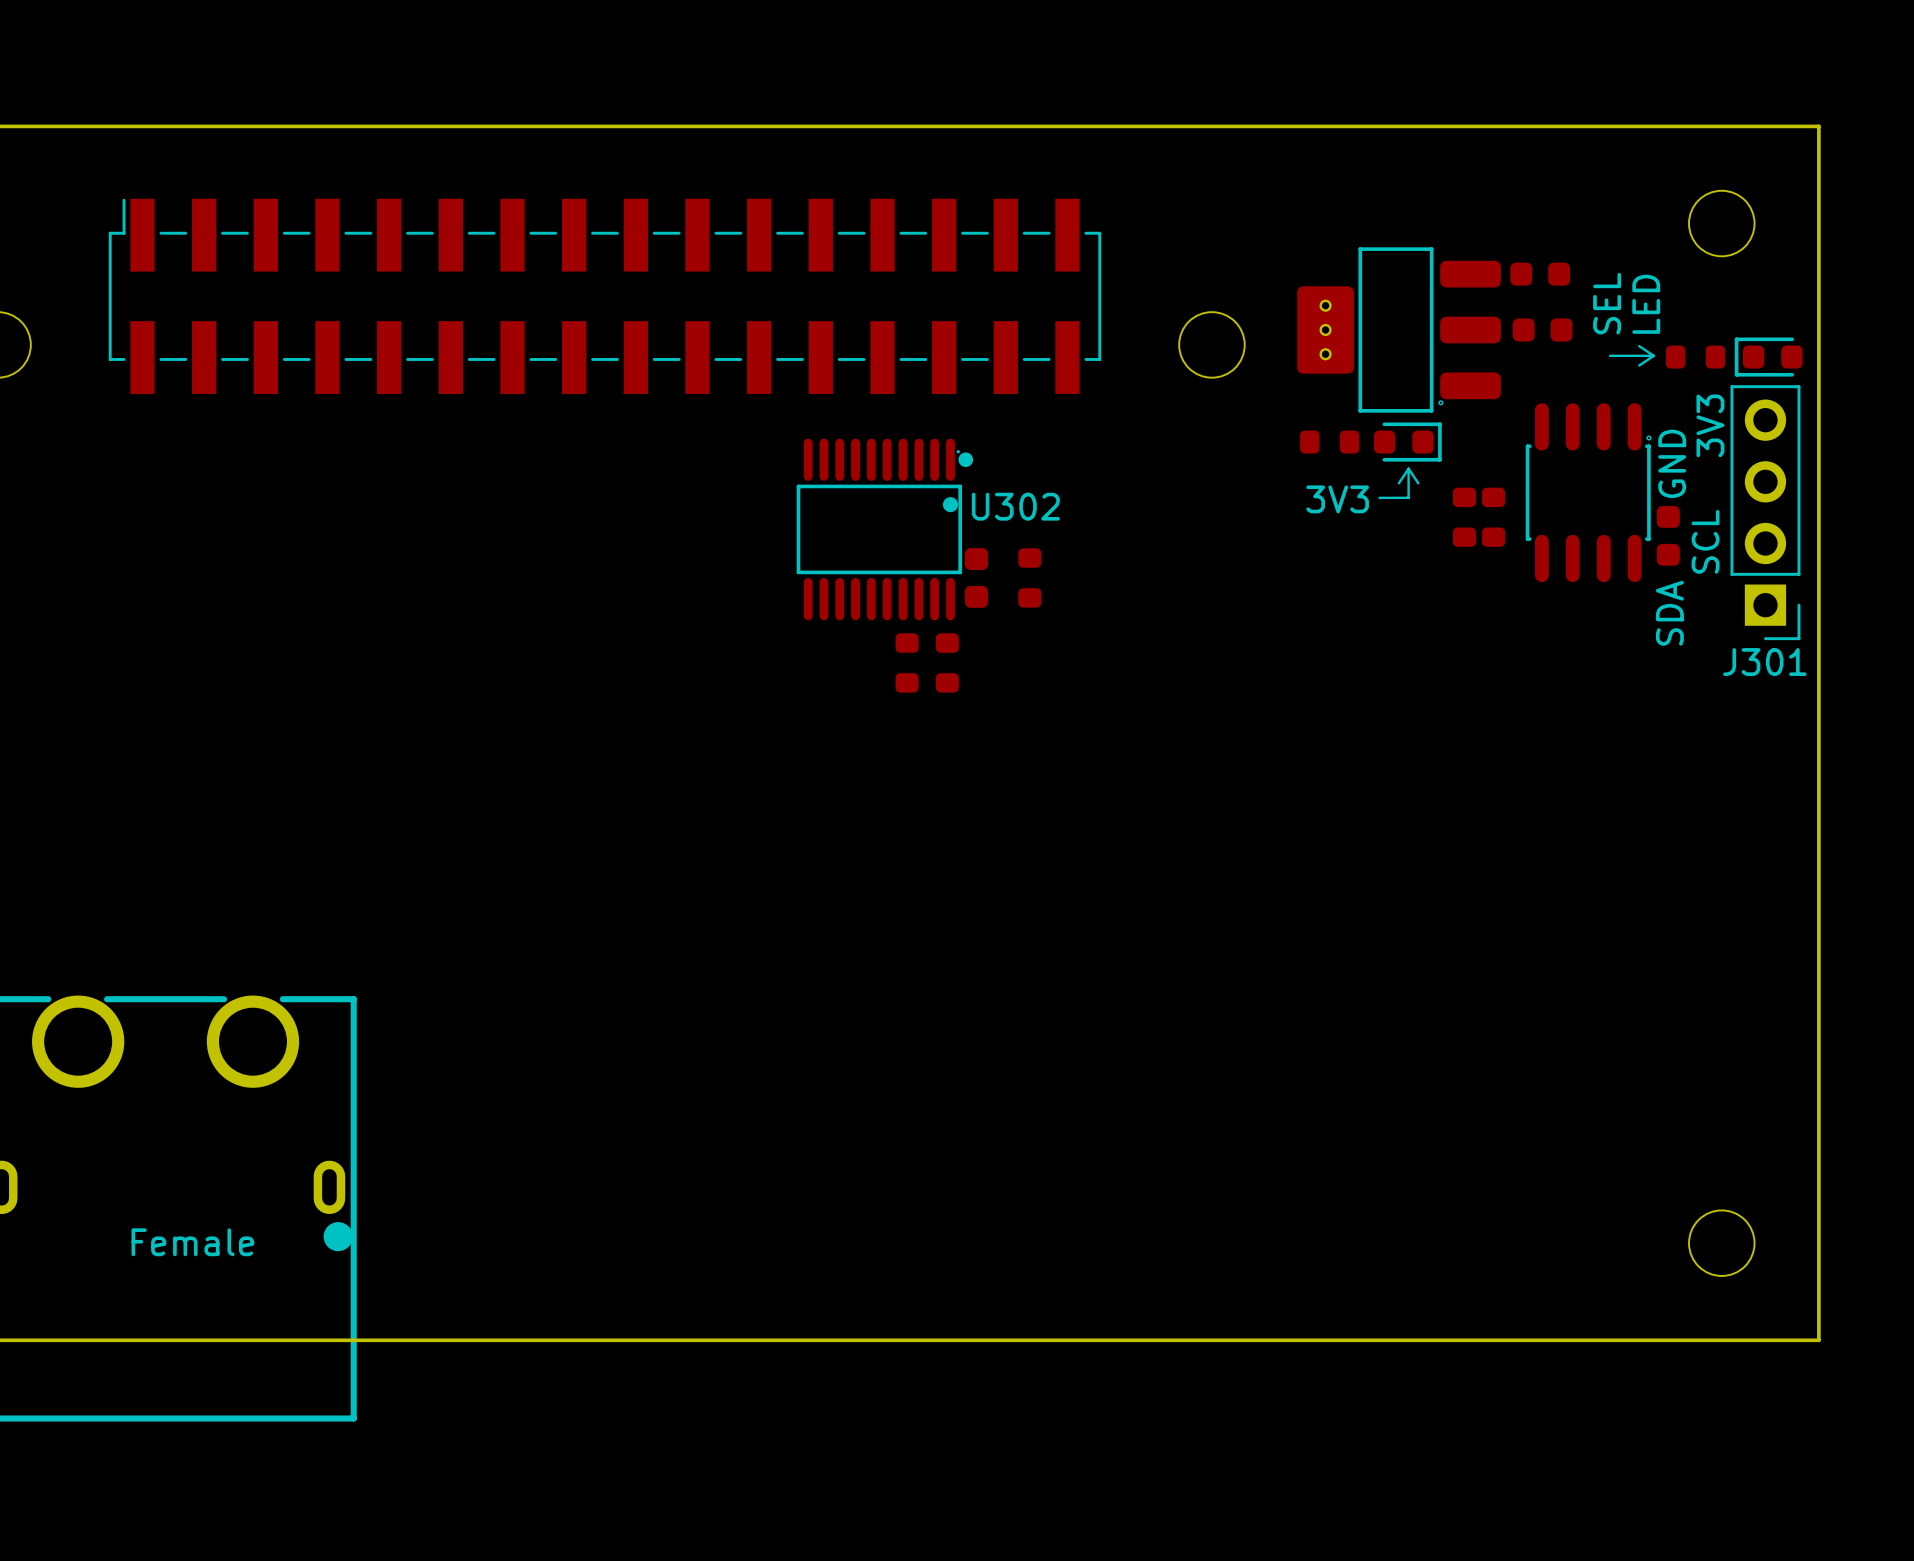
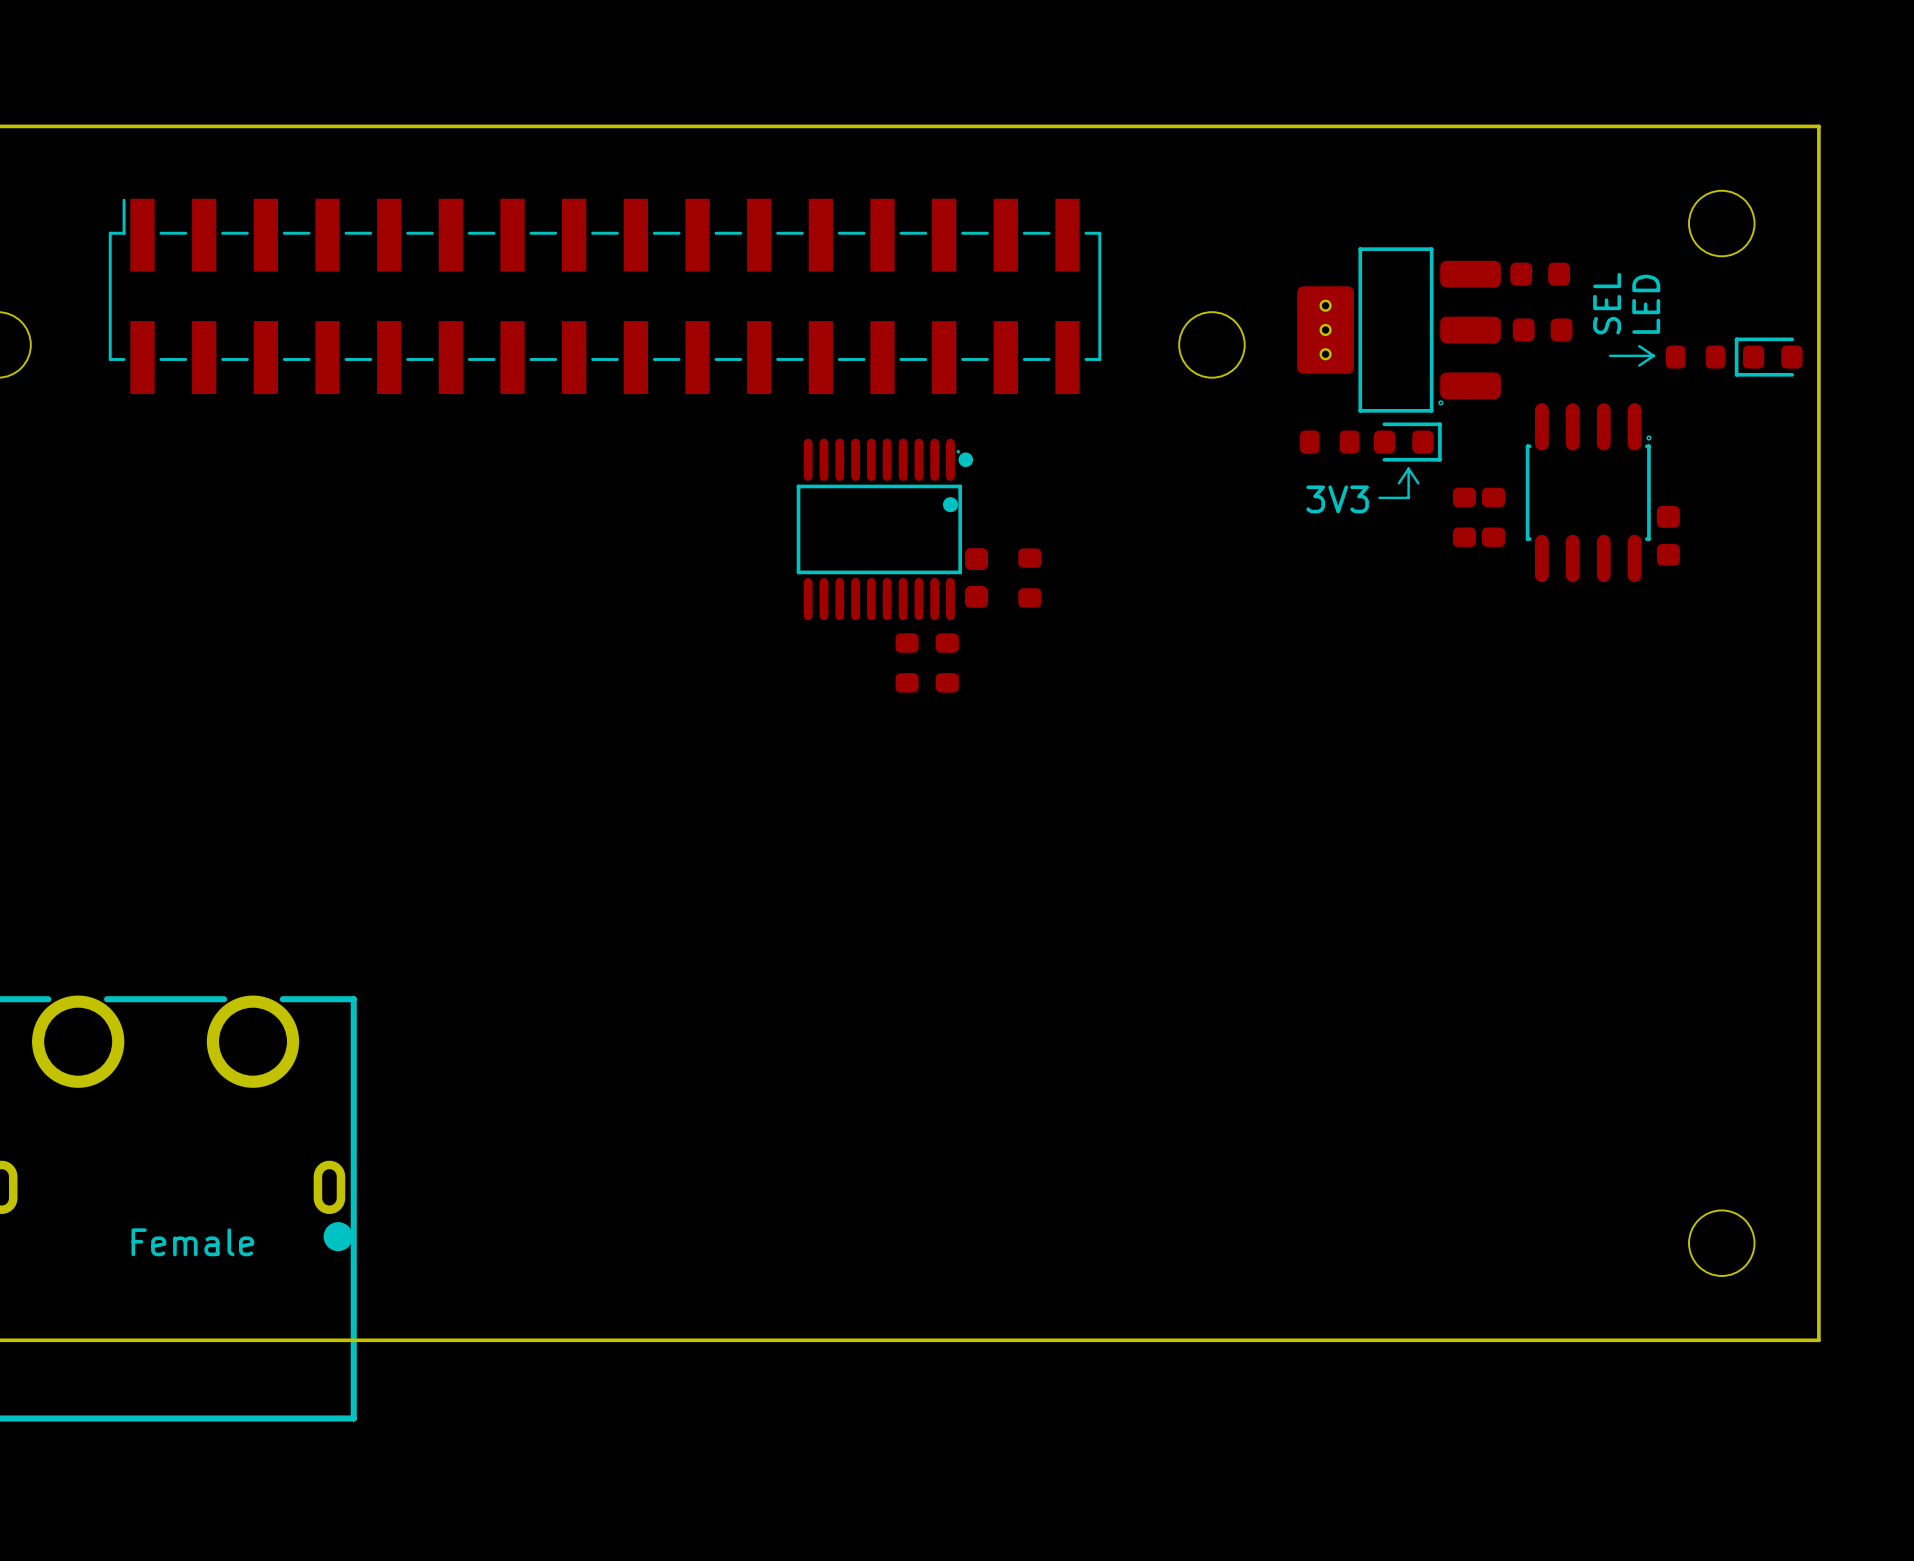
text: 3V3 (1710, 425) -> none
text: GND (1672, 463) -> none
U302 name: U302 (1015, 506) -> none
J301: (1765, 512) -> none
text: SCL (1705, 541) -> none
text: SDA (1669, 613) -> none

